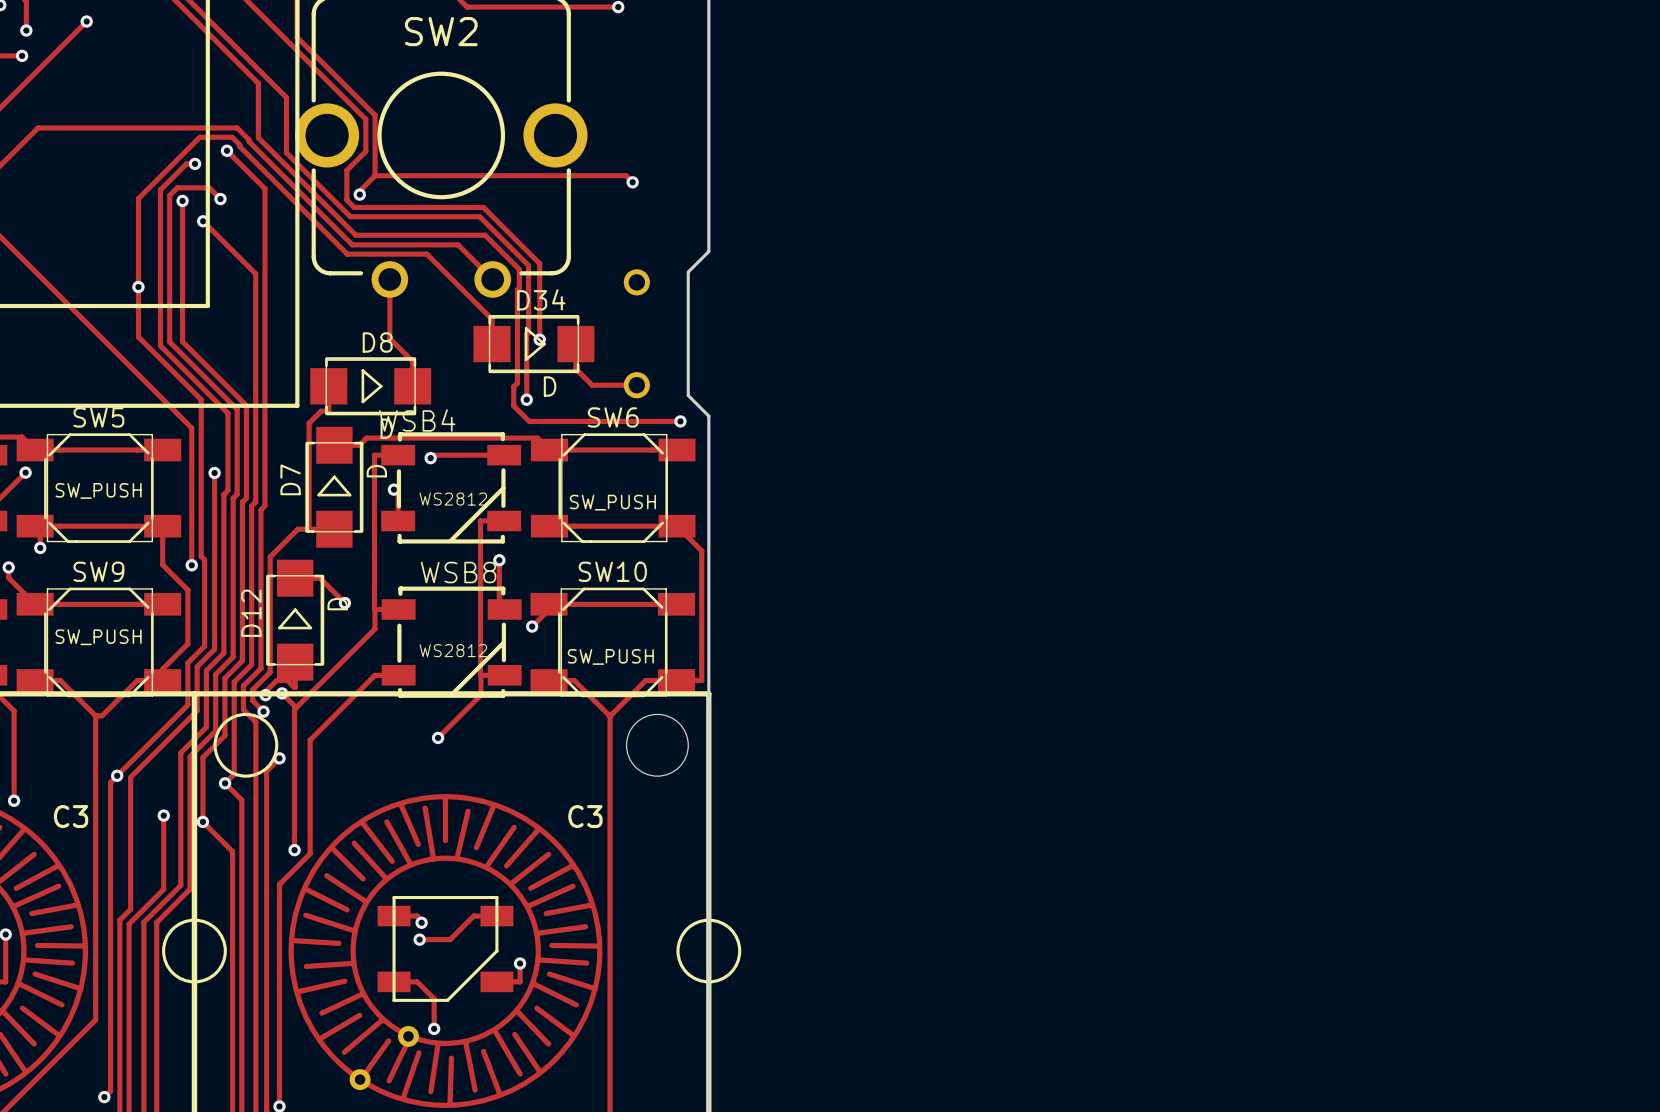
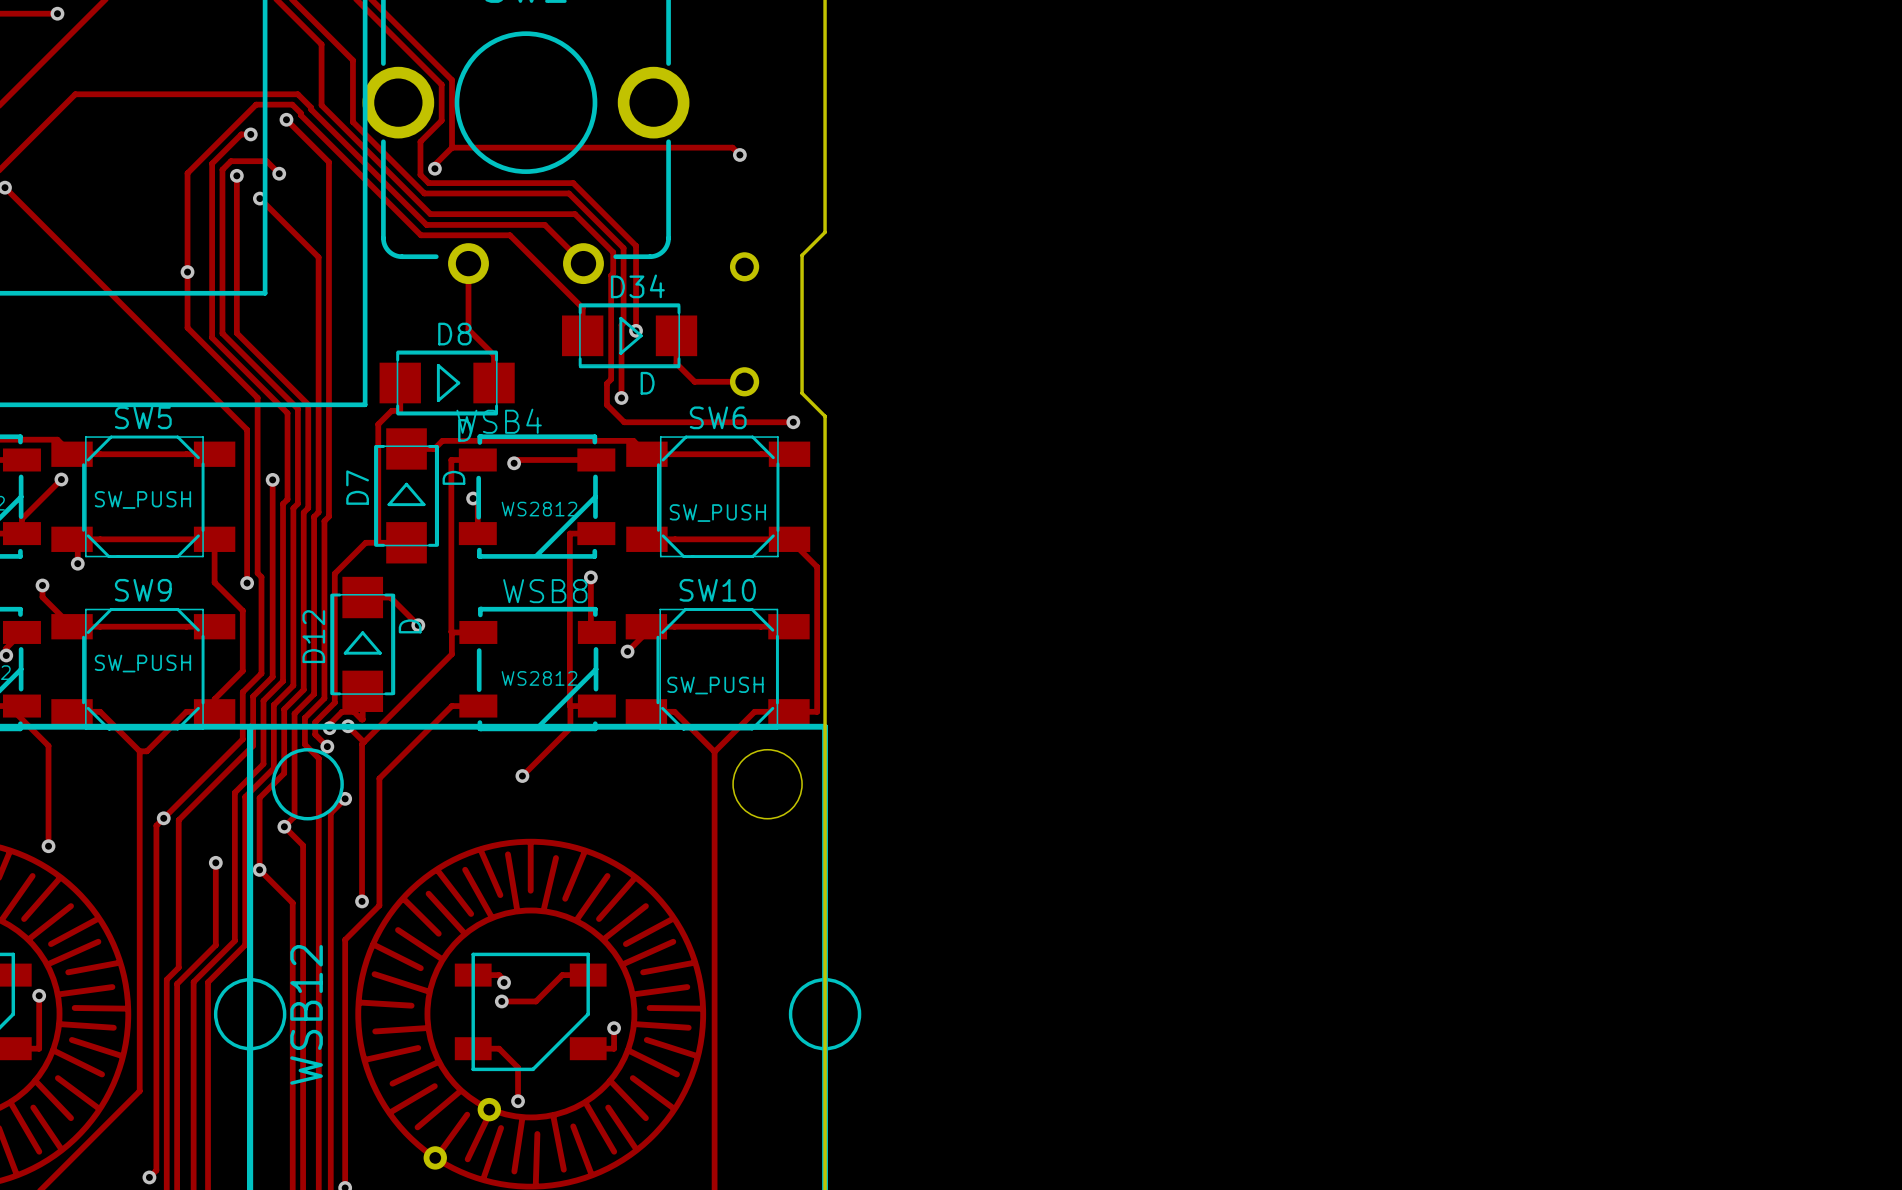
part text: C3 (71, 816) -> none
WSB12 text: C3 (585, 816) -> none
WSB12 name: none -> WSB12 (306, 1014)

